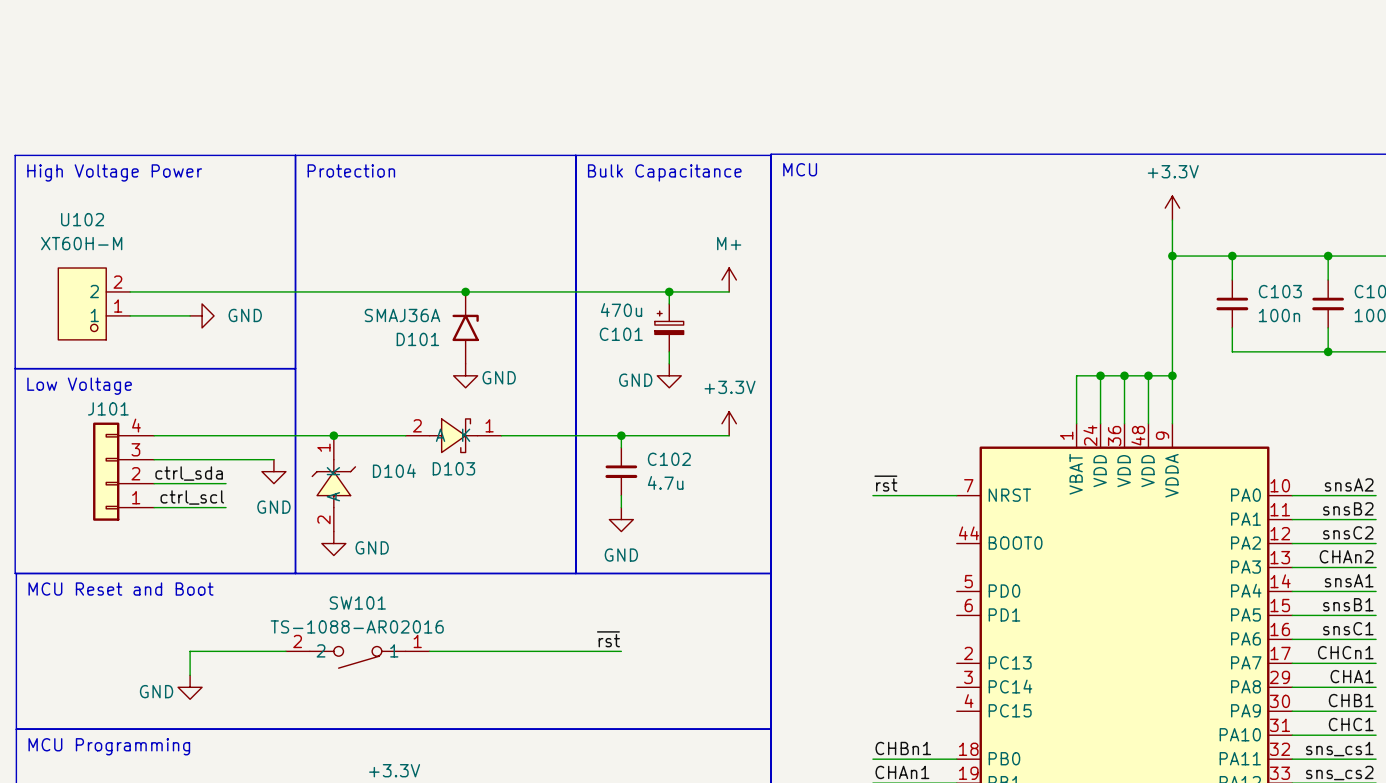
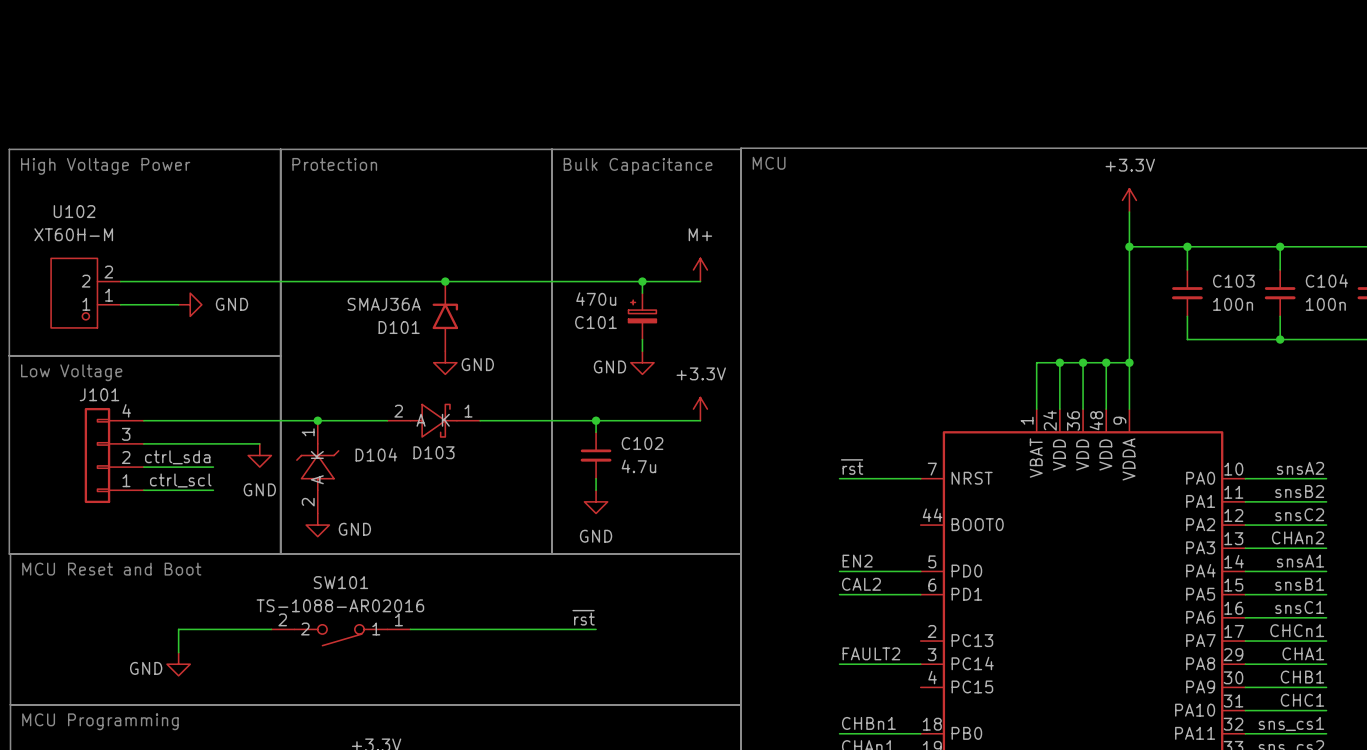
label: none -> EN2 (857, 561)
wire: none -> (839, 571) (920, 571)
label: none -> CAL2 (861, 584)
wire: none -> (839, 594) (920, 594)
label: none -> FAULT2 (871, 653)
wire: none -> (839, 664) (920, 664)

